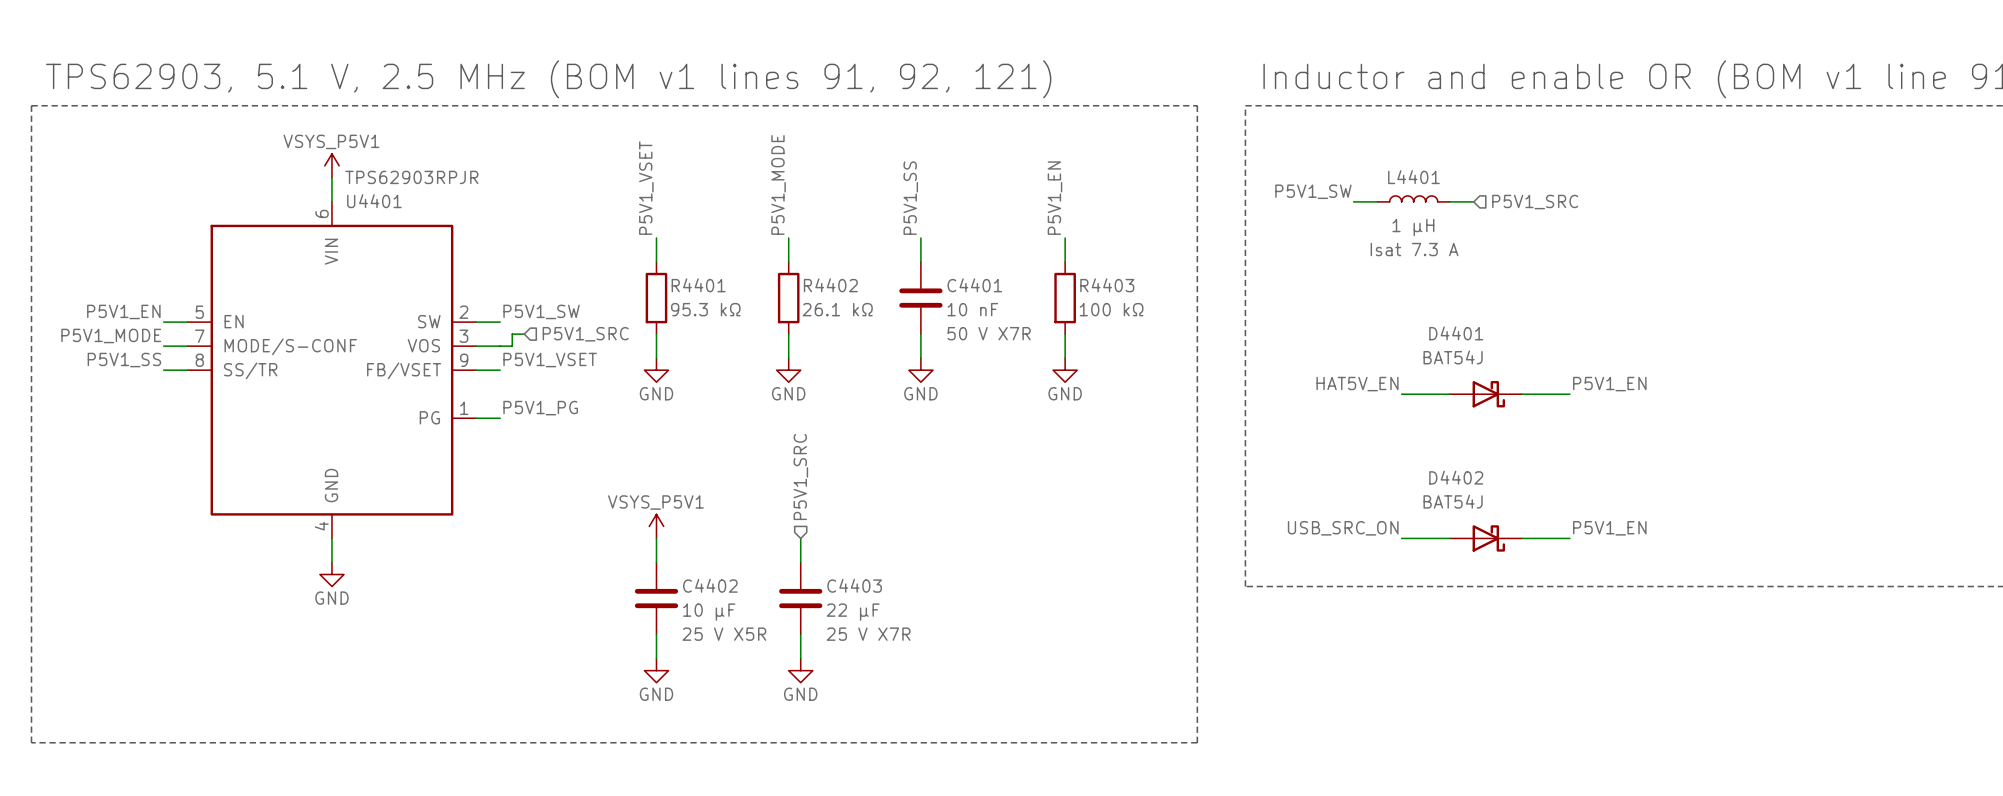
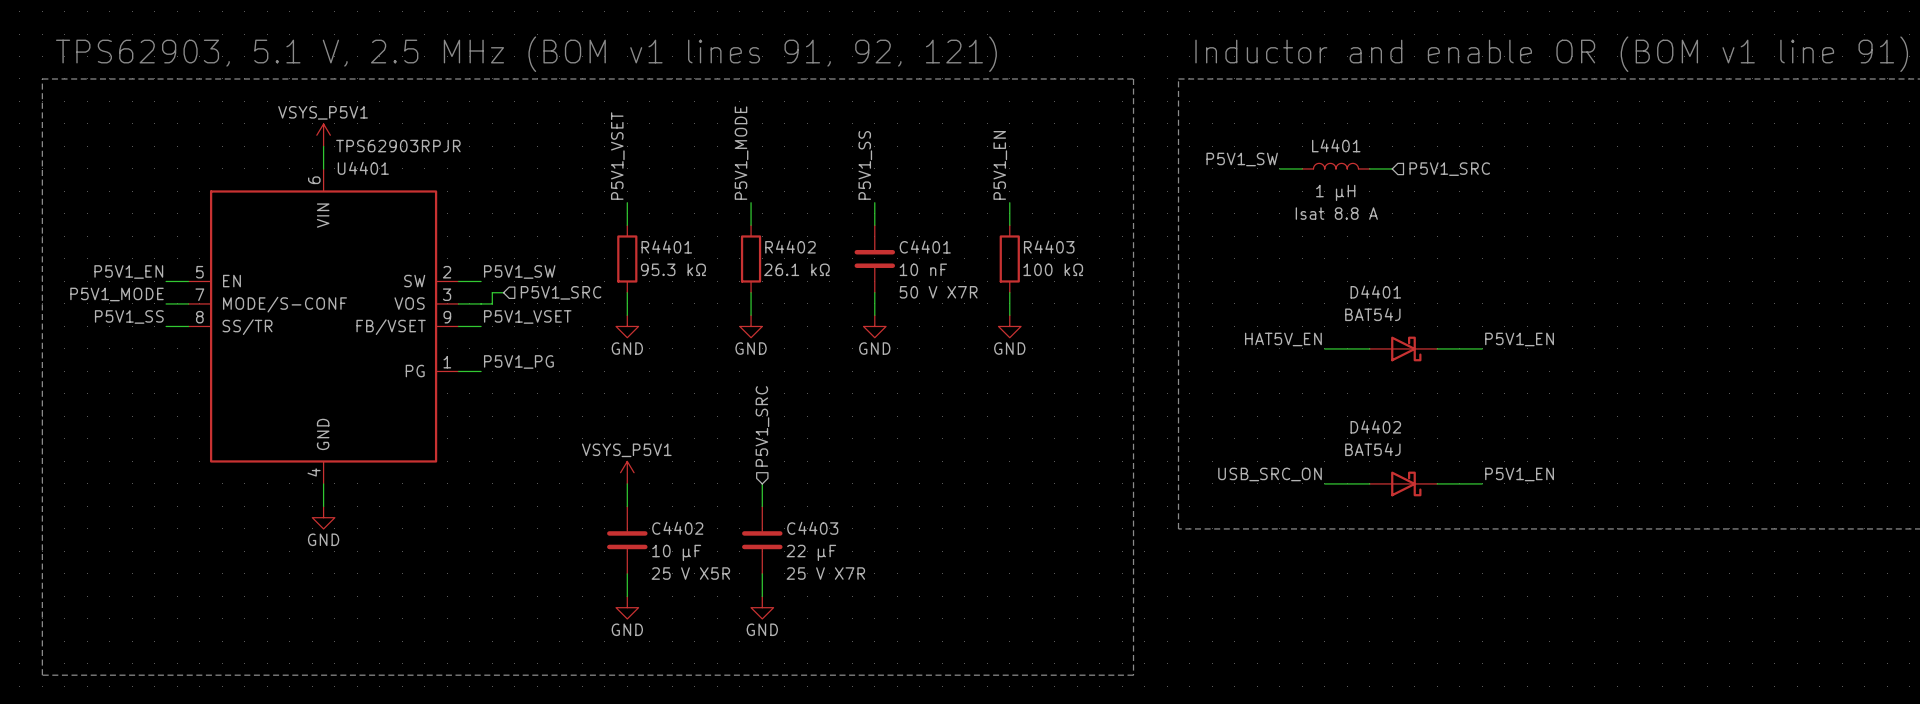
L4401 text: Isat 7.3 A (1414, 249) -> Isat 8.8 A (1336, 213)

